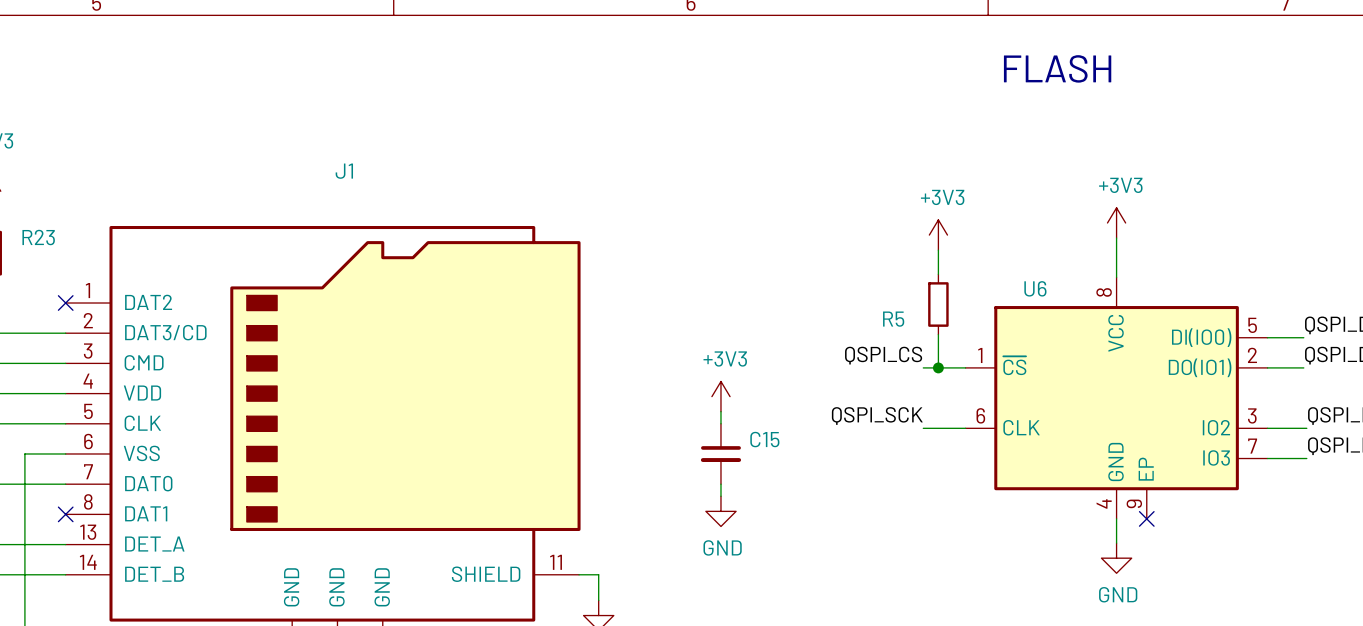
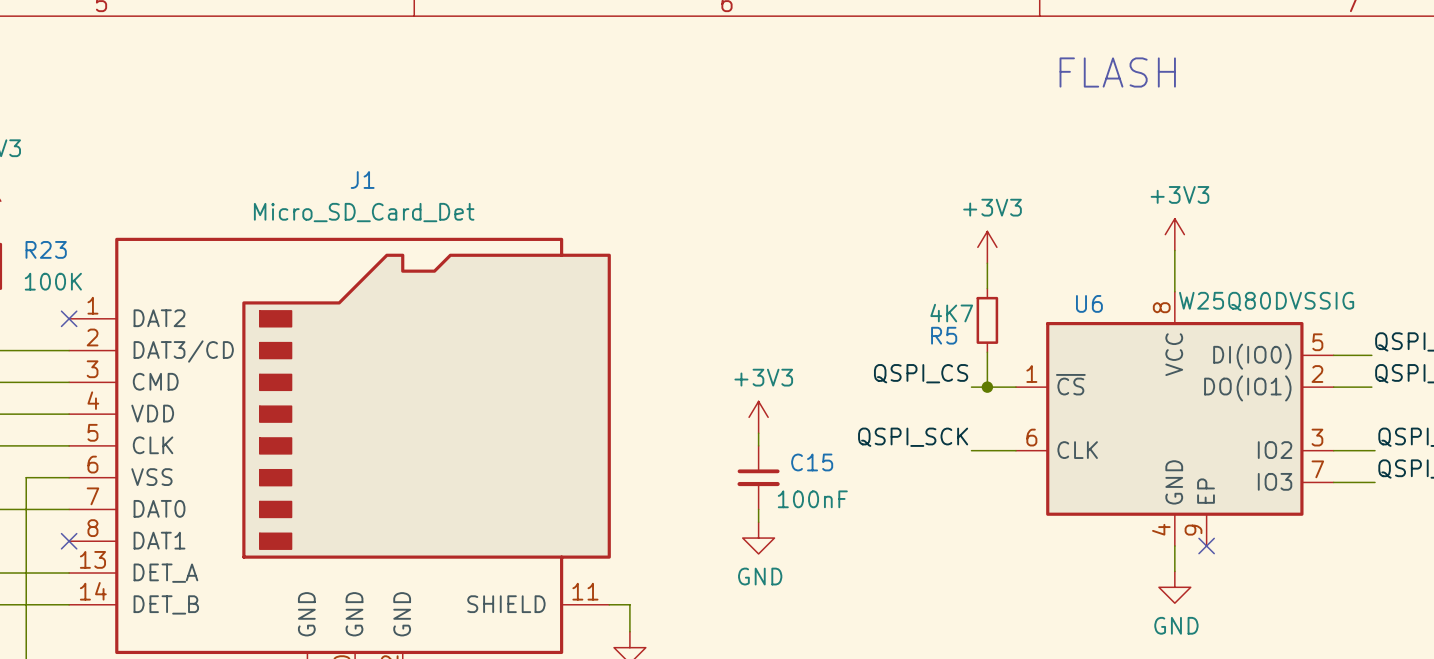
J1 value: none -> Micro_SD_Card_Det (364, 212)
R23 value: none -> 100K (53, 281)
U6 value: none -> W25Q80DVSSIG (1266, 301)
R5 value: none -> 4K7 (951, 313)
C15 value: none -> 100nF (812, 499)

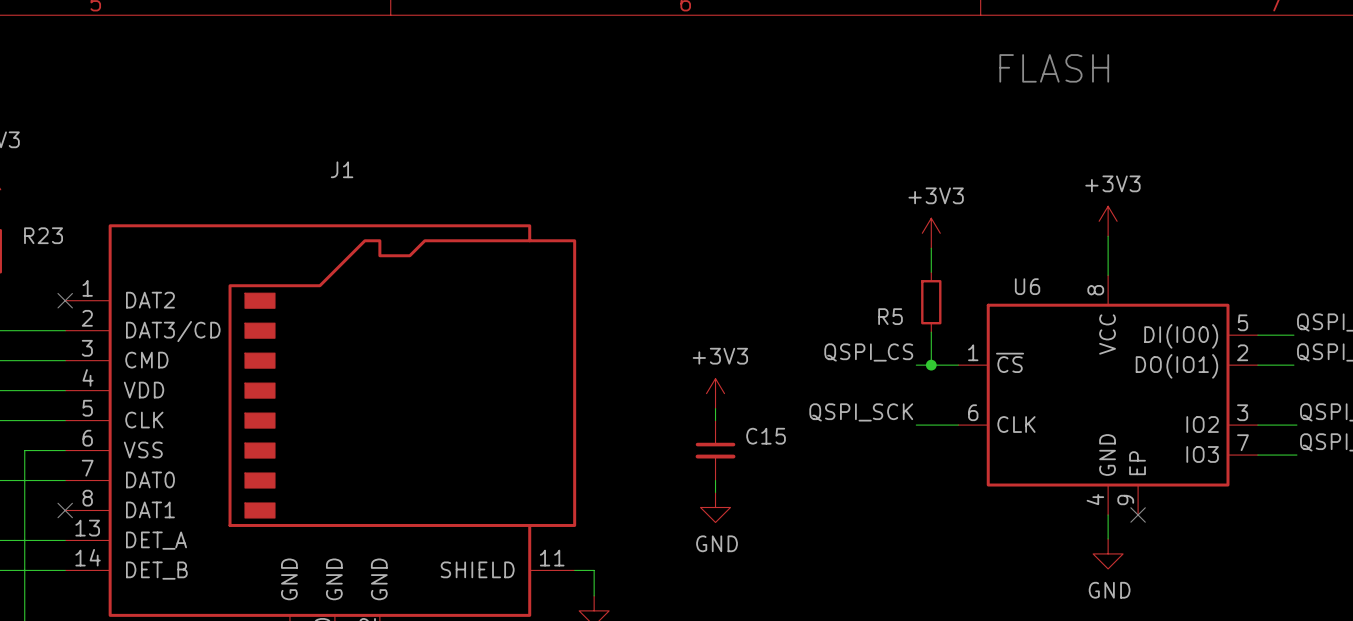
J1 value: Micro_SD_Card_Det (364, 212) -> none
R23 value: 100K (53, 281) -> none
U6 value: W25Q80DVSSIG (1266, 301) -> none
R5 value: 4K7 (951, 313) -> none
C15 value: 100nF (812, 499) -> none

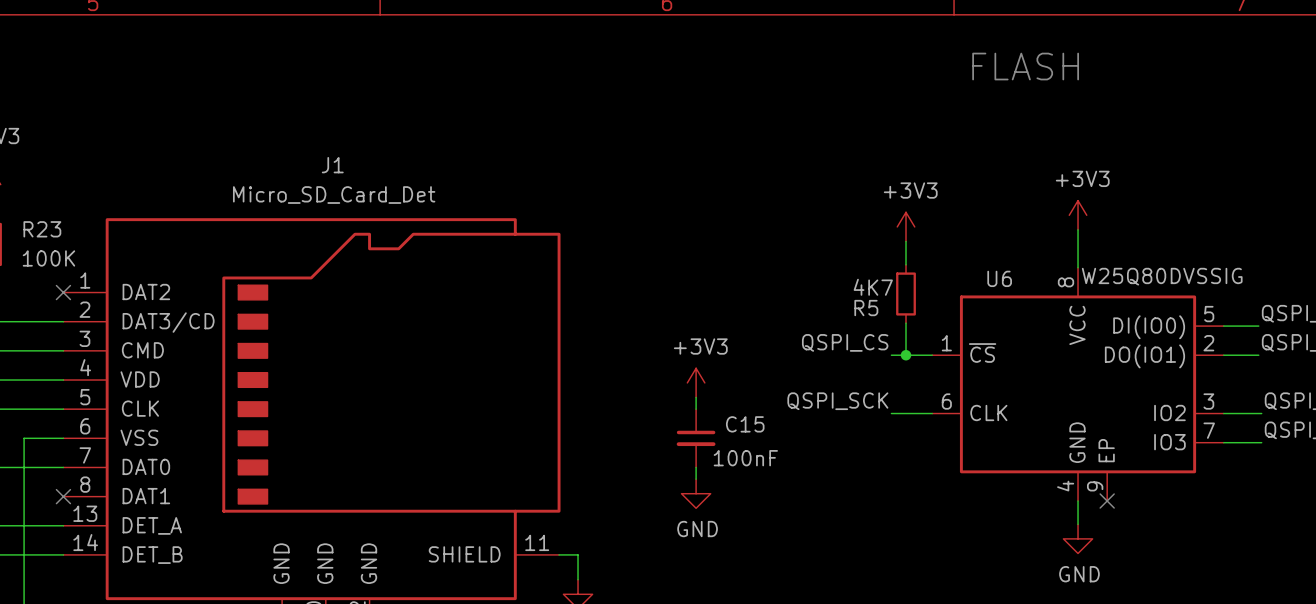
J1 value: none -> Micro_SD_Card_Det (334, 195)
R23 value: none -> 100K (48, 258)
U6 value: none -> W25Q80DVSSIG (1162, 276)
R5 value: none -> 4K7 (873, 287)
C15 value: none -> 100nF (745, 458)

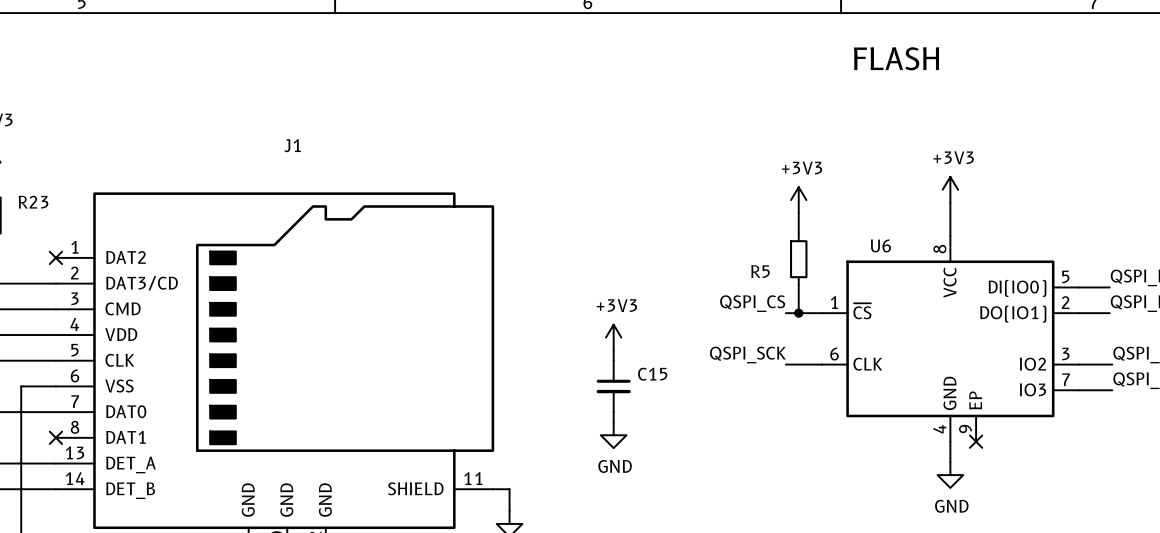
J1 value: Micro_SD_Card_Det (334, 195) -> none
R23 value: 100K (48, 258) -> none
U6 value: W25Q80DVSSIG (1162, 276) -> none
R5 value: 4K7 (873, 287) -> none
C15 value: 100nF (745, 458) -> none

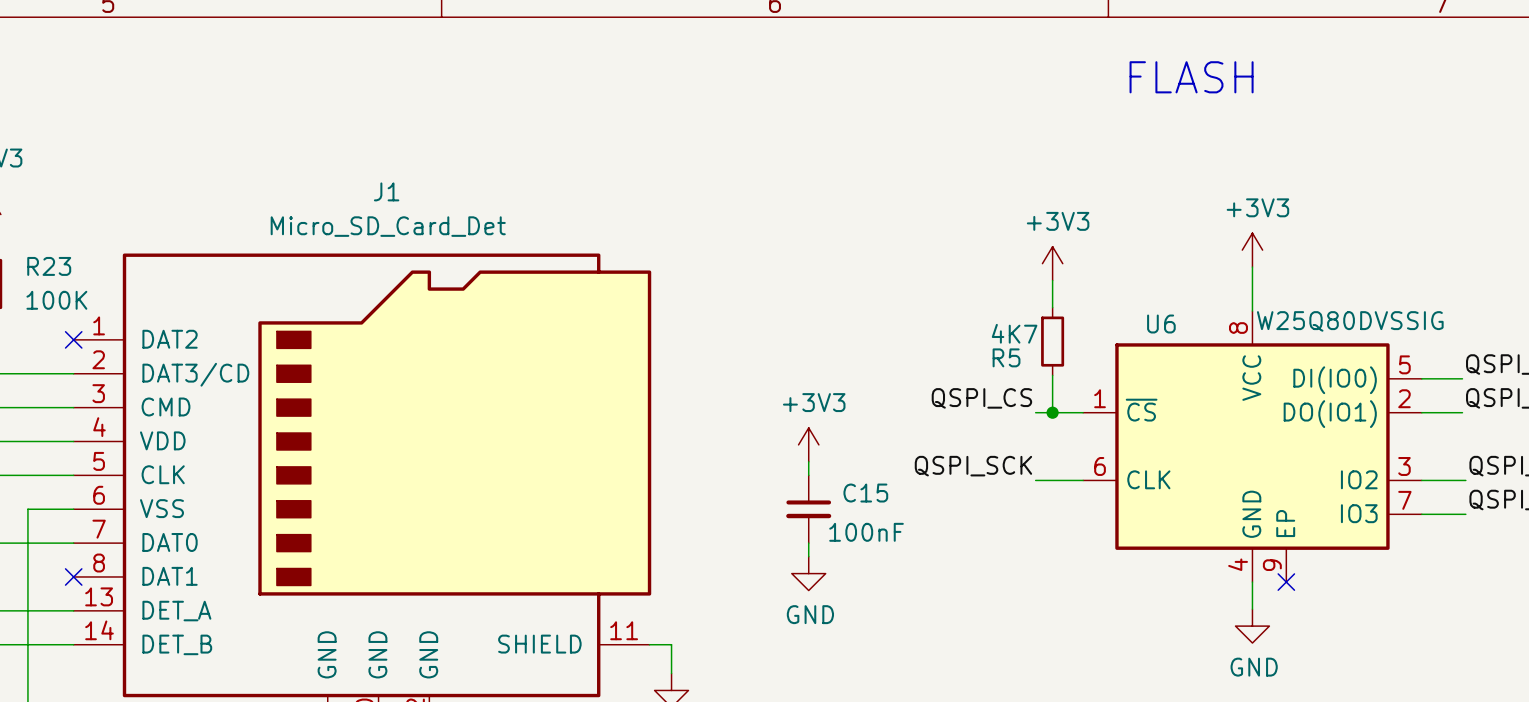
J1 value: none -> Micro_SD_Card_Det (388, 226)
R23 value: none -> 100K (56, 300)
U6 value: none -> W25Q80DVSSIG (1350, 321)
R5 value: none -> 4K7 (1014, 333)
C15 value: none -> 100nF (866, 532)

